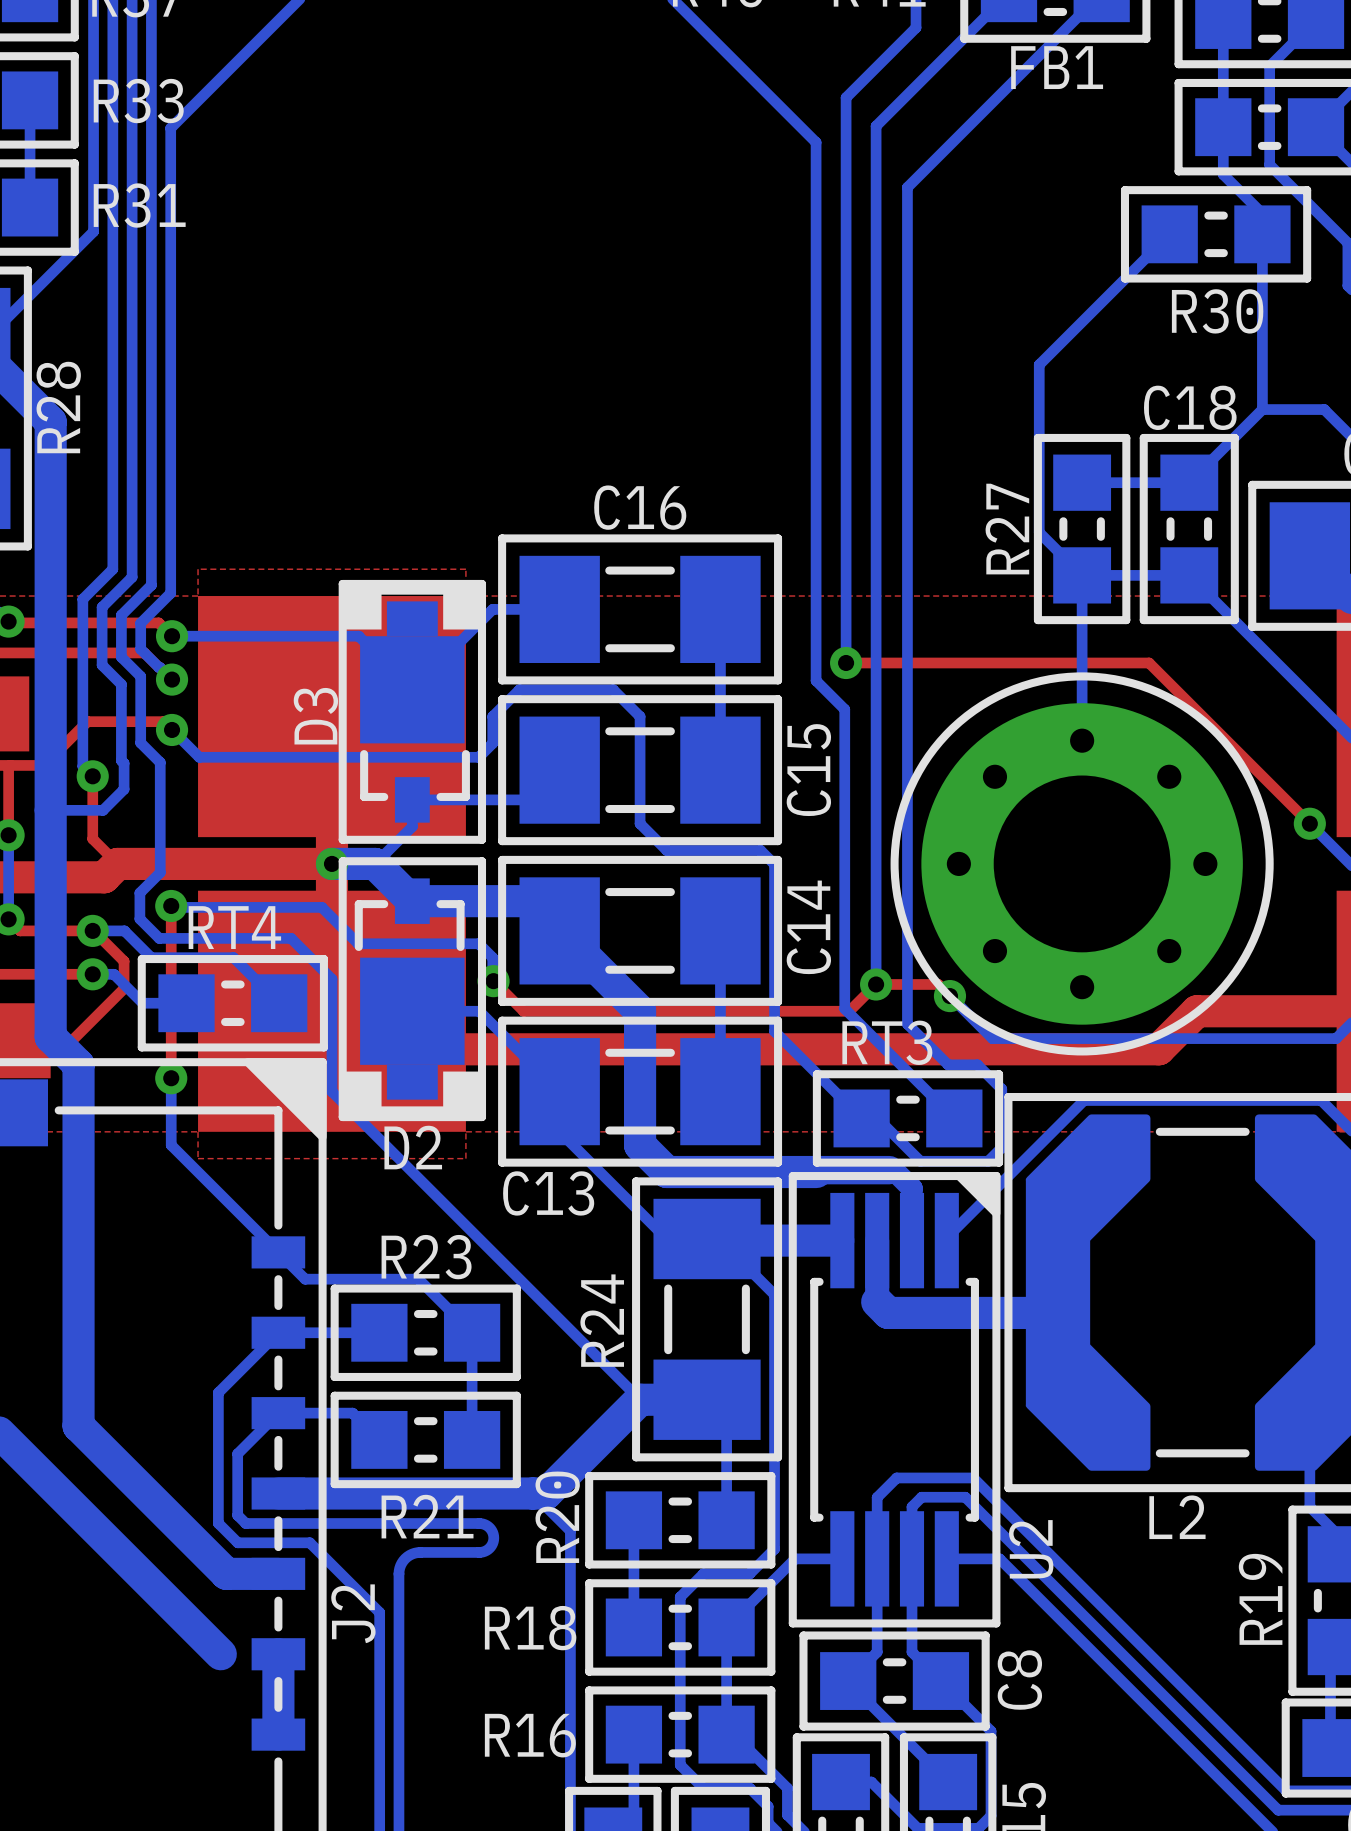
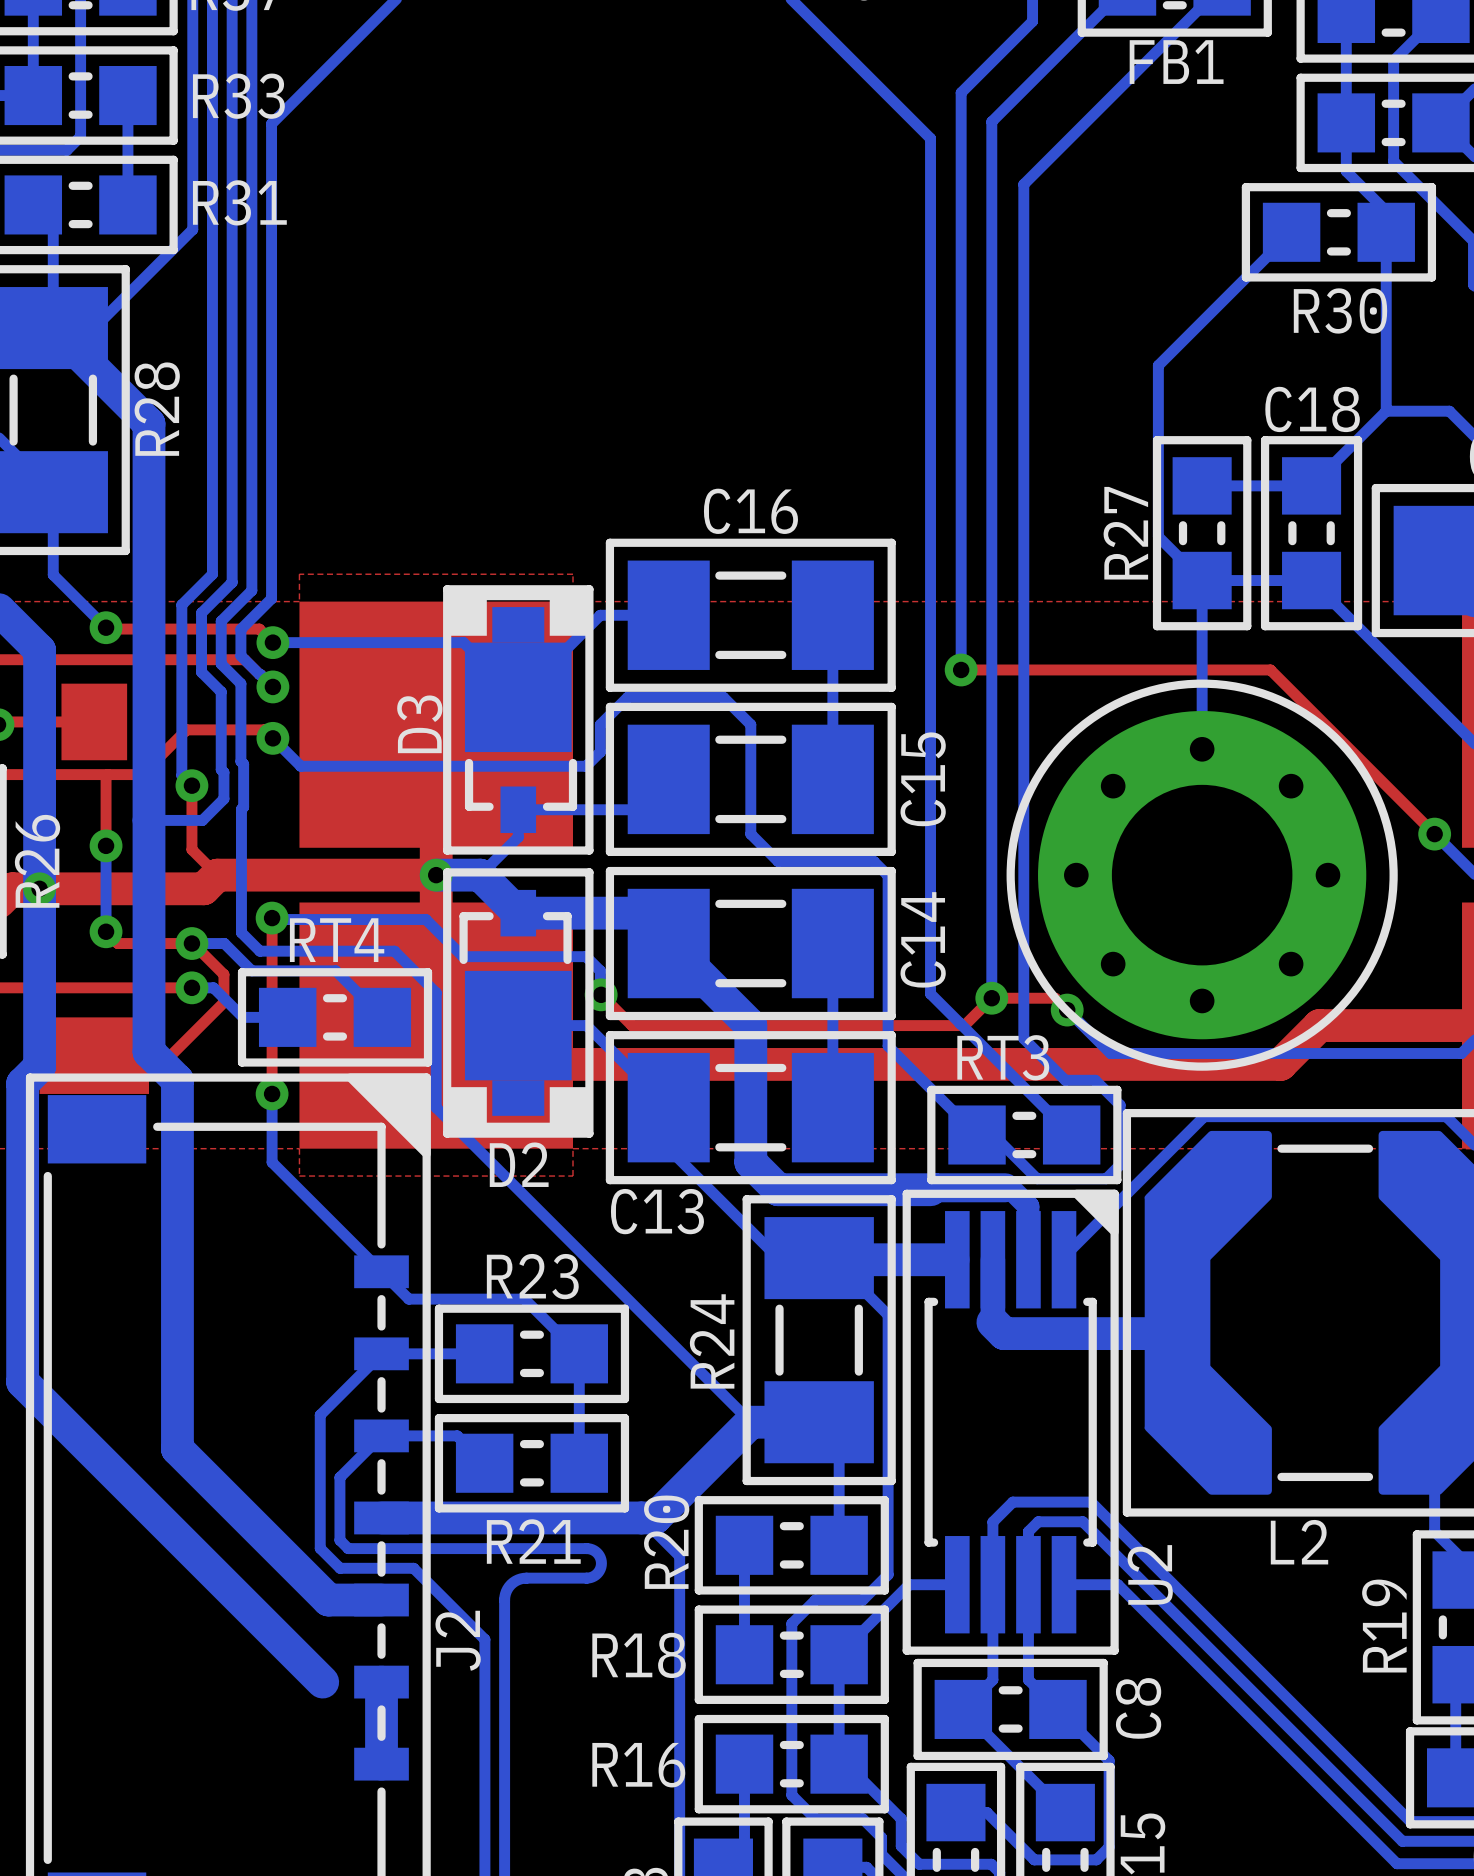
bottom track: (816, 680) (844, 709) (844, 1008) -> (930, 688) (930, 993) (959, 1023)
bottom track: (140, 742) (160, 762) (160, 872) (139, 893) (141, 920) -> (240, 751) (240, 761) (243, 764) (243, 807) (241, 809) (241, 932)

